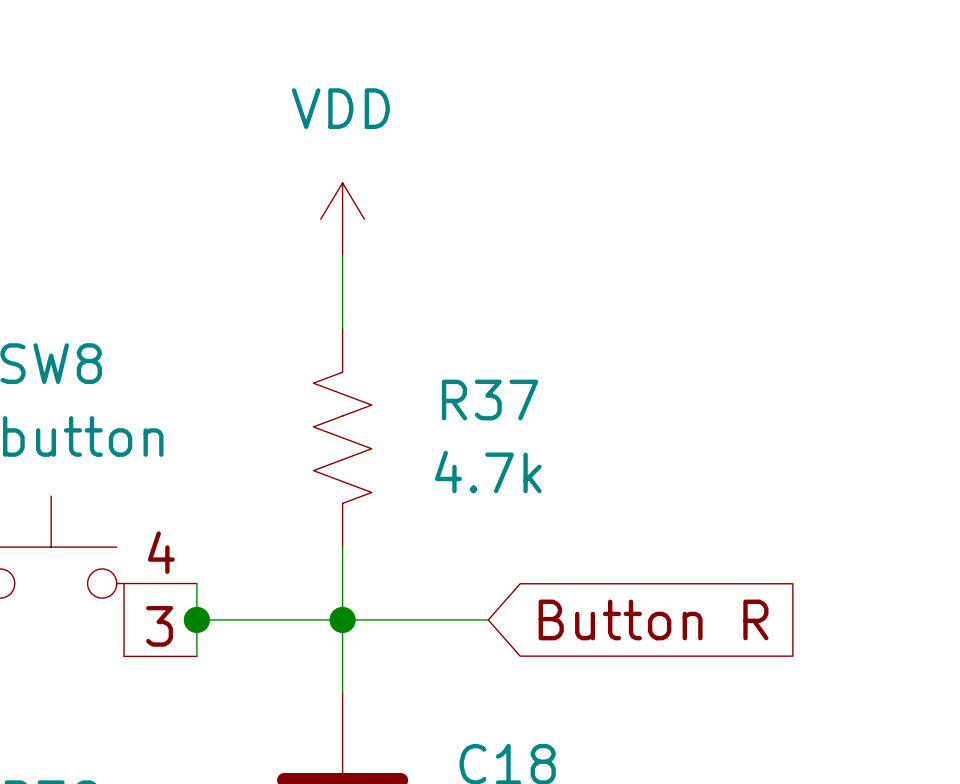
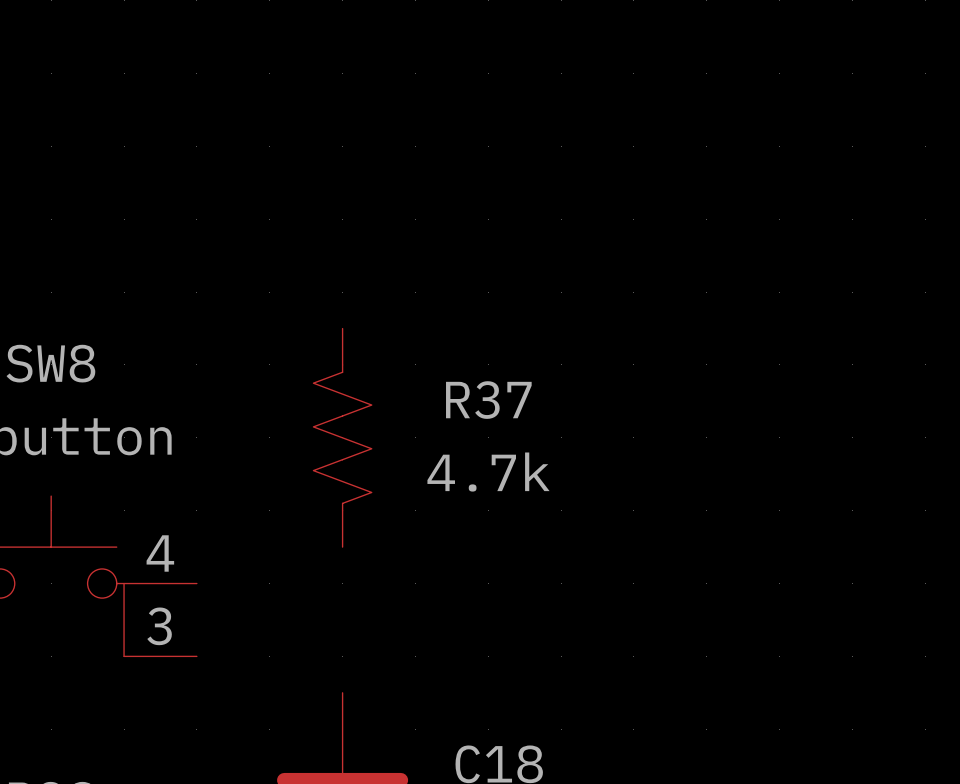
power symbol: VDD (342, 219) -> none
wire: (342, 255) (342, 328) -> none
wire: (342, 547) (342, 692) -> none
wire: (196, 583) (196, 656) -> none
wire: (196, 619) (488, 619) -> none
junction: (196, 619) -> none
junction: (342, 619) -> none
global label: Button R (653, 619) -> none

